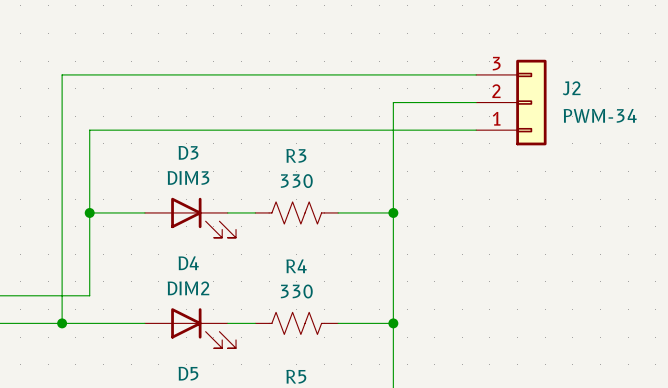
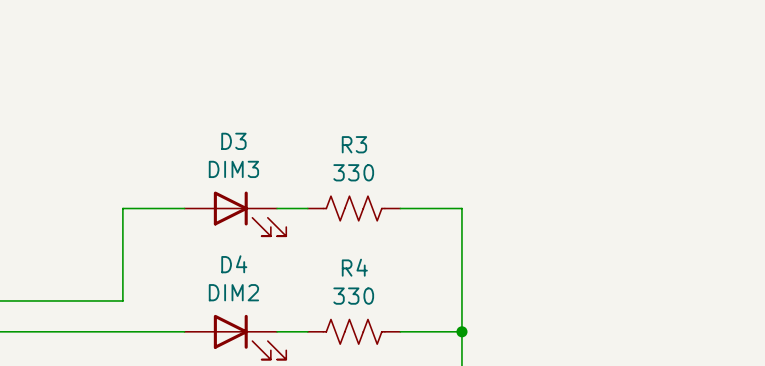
wire: (476, 74) (62, 74) (62, 323) -> none
wire: (476, 102) (393, 102) (393, 212) -> none
J2: PWM-34 (511, 102) -> none
wire: (476, 130) (89, 130) (89, 212) -> none
junction: (89, 212) -> none
junction: (393, 212) -> none
junction: (62, 323) -> none

